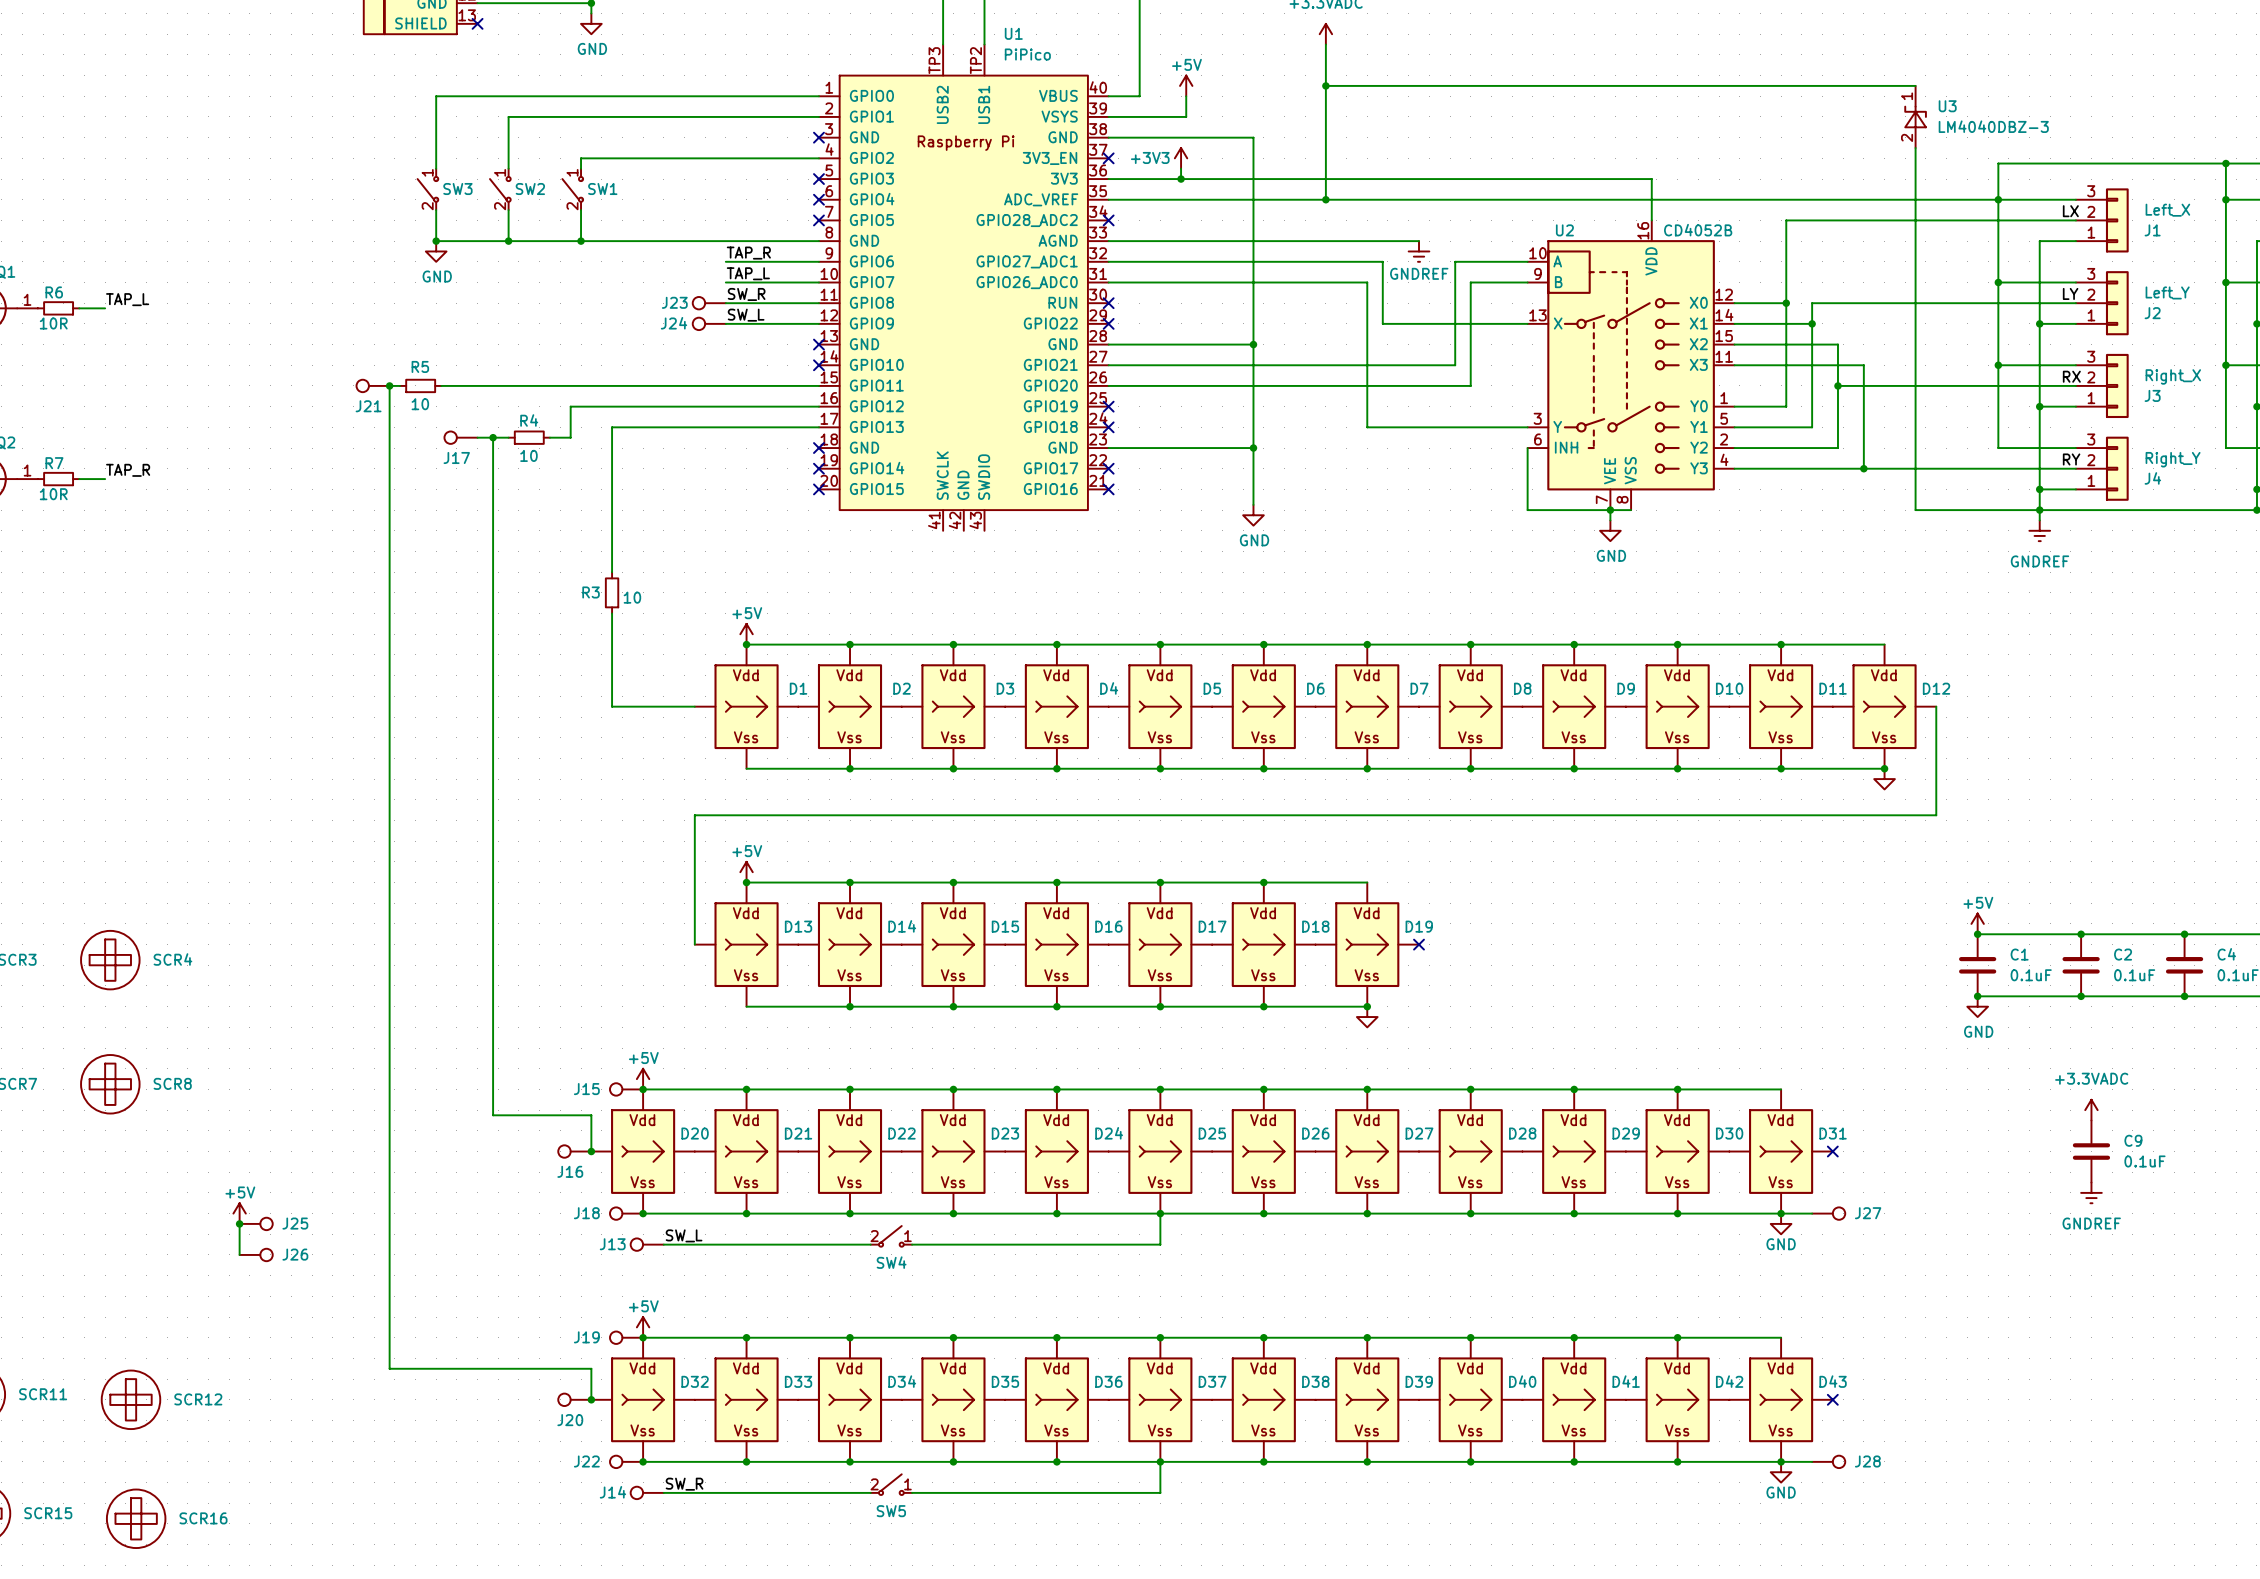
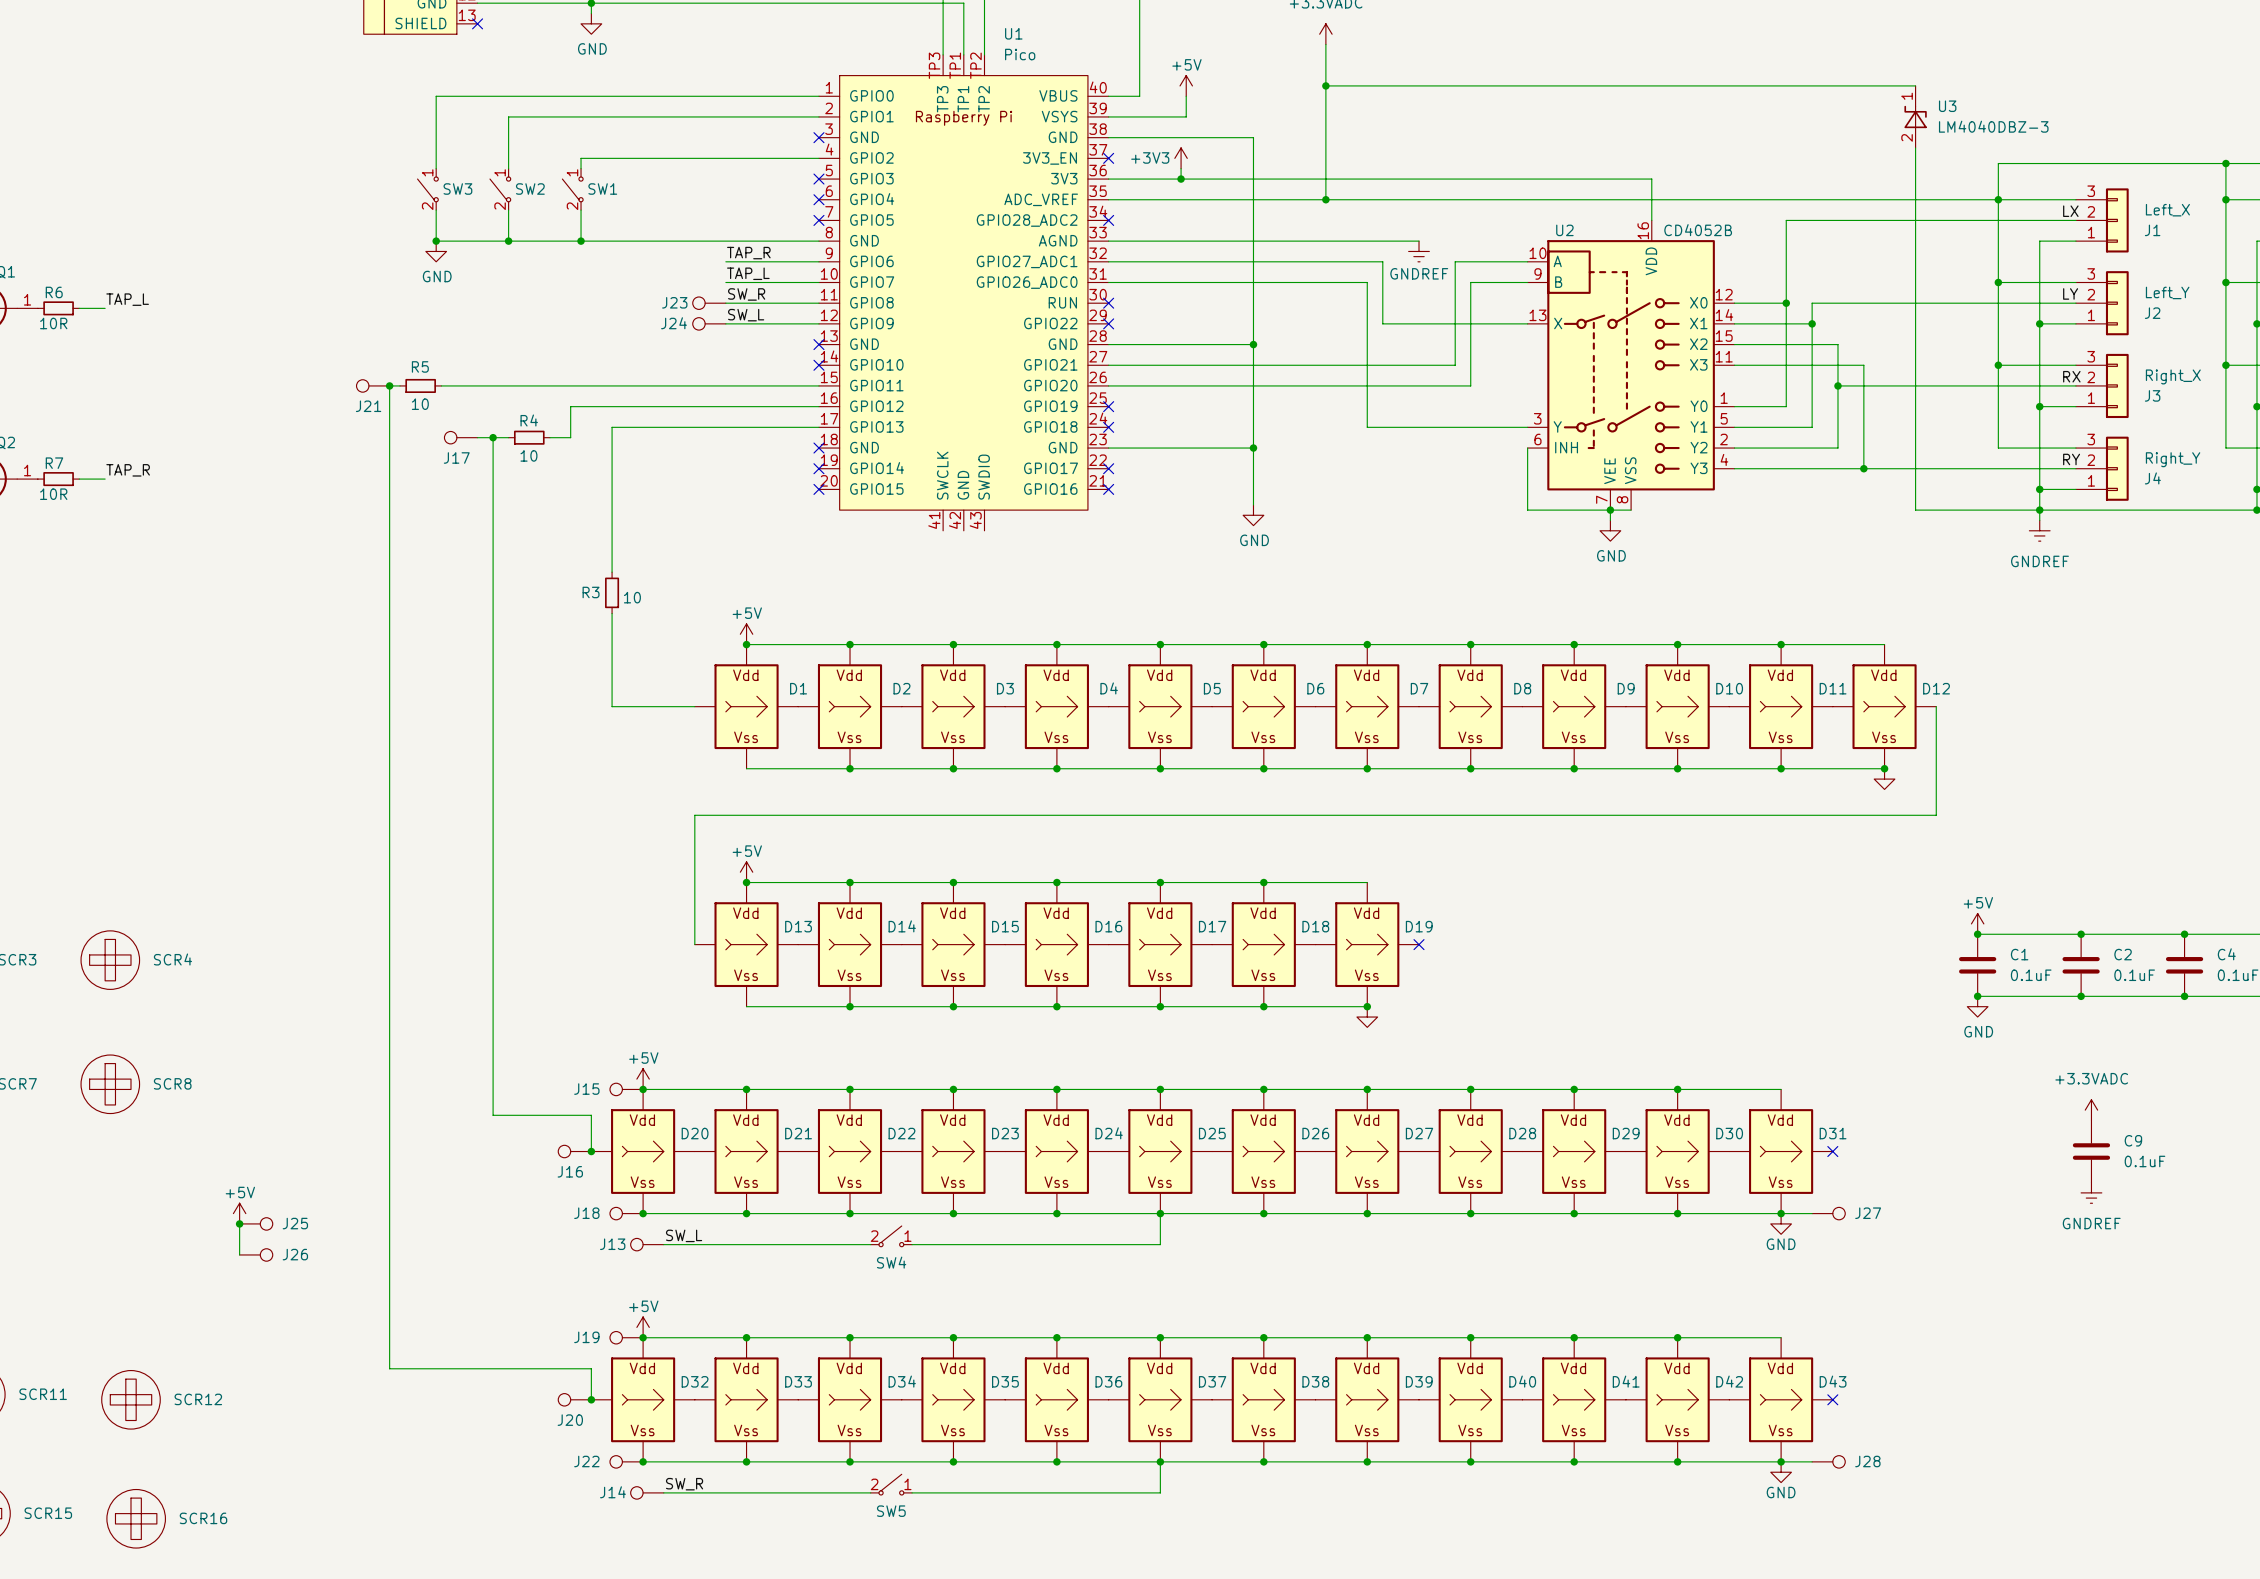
wire: none -> (591, 3) (963, 3) (963, 54)
U1 symbol: [818, 44, 1109, 531] -> [818, 54, 1109, 531]
U1 value: PiPico (1027, 54) -> Pico (1020, 54)

